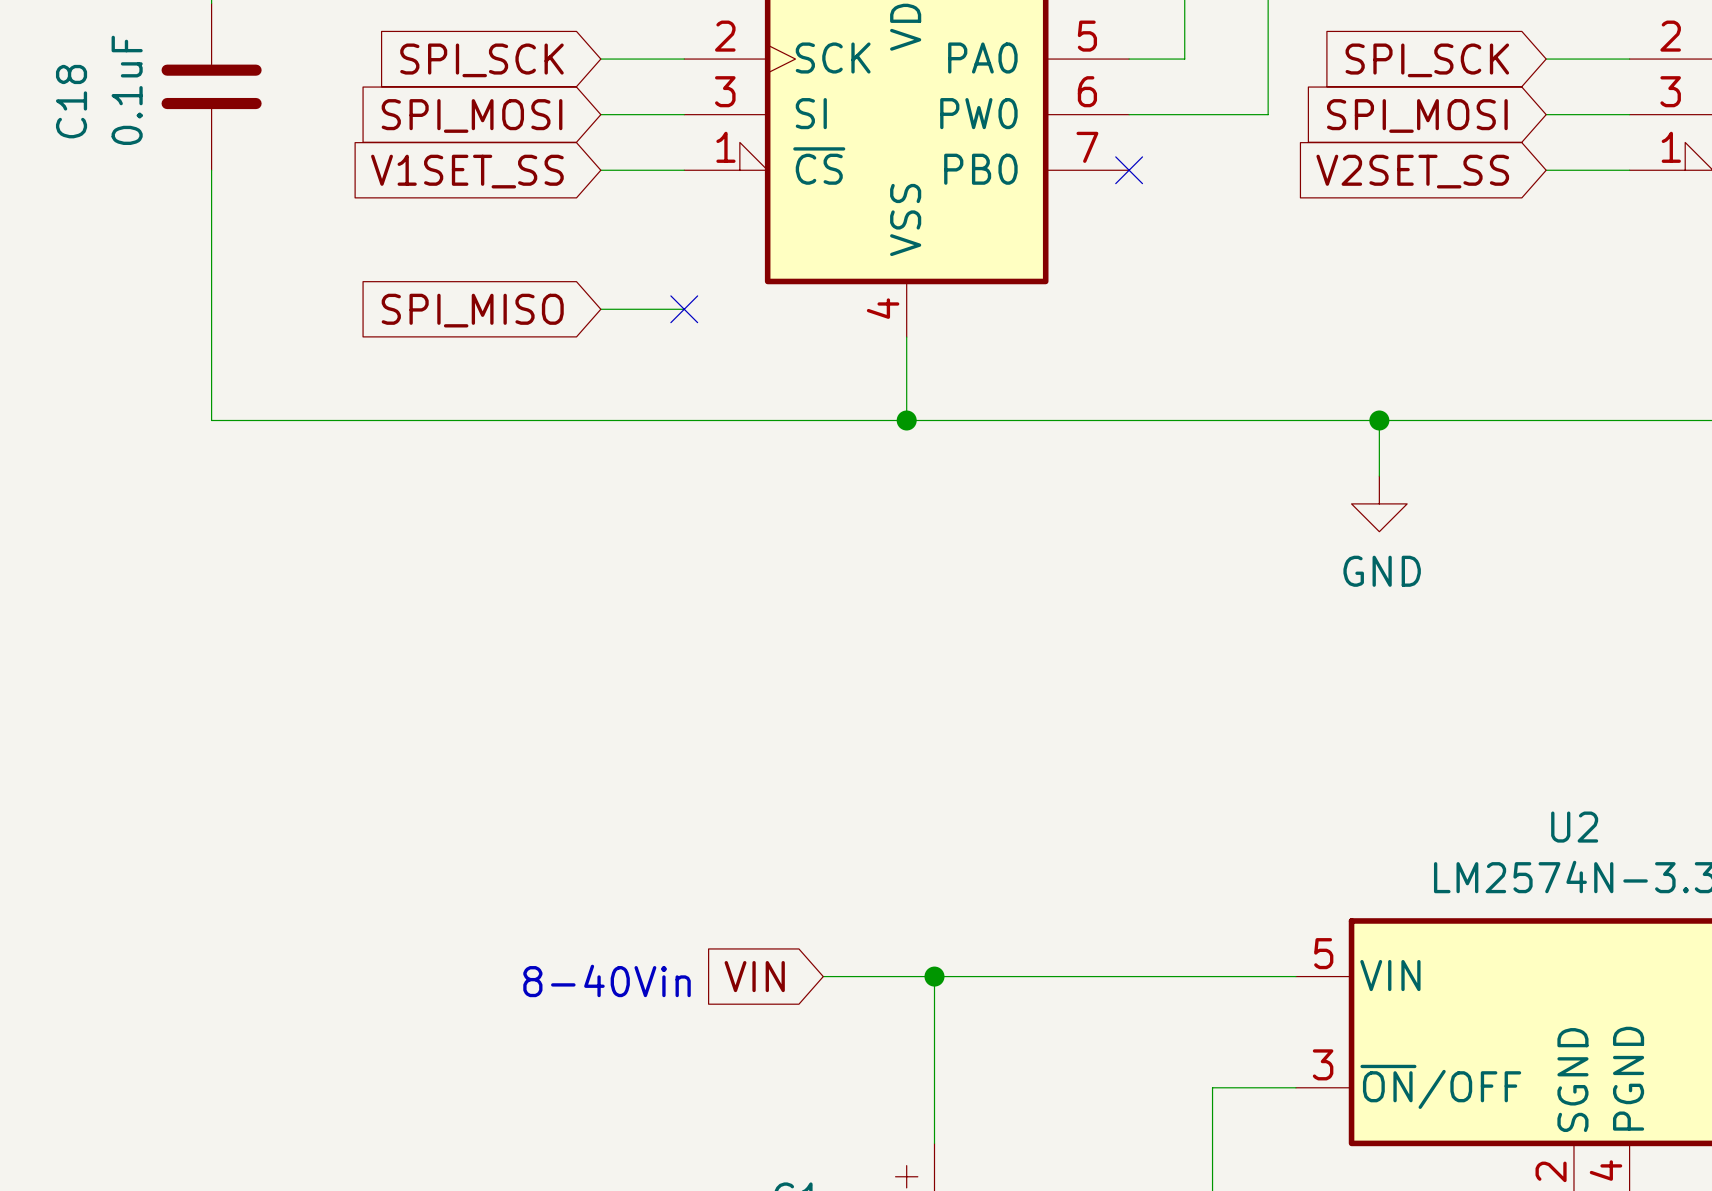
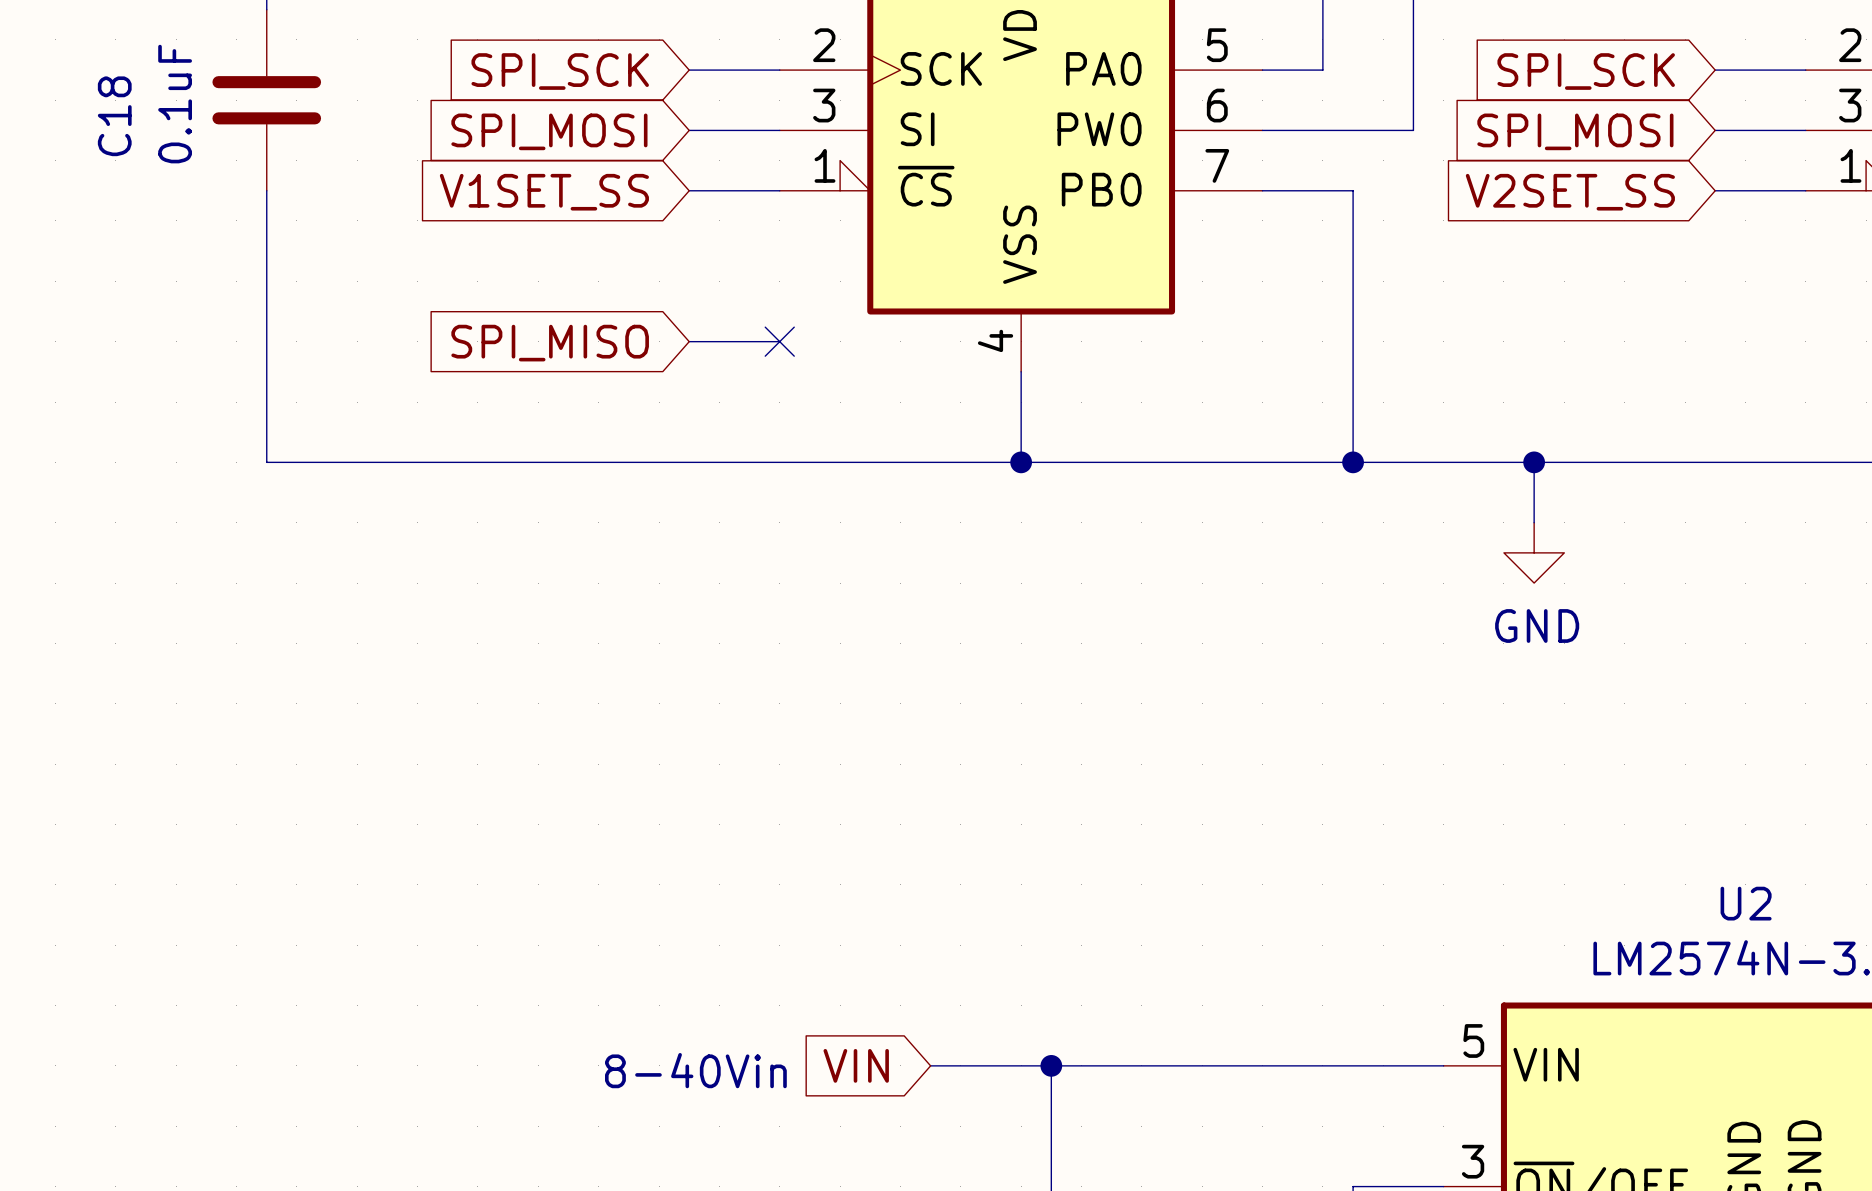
wire: none -> (1262, 190) (1353, 190) (1353, 462)
no-connect mark: (1129, 170) -> none
junction: none -> (1353, 462)

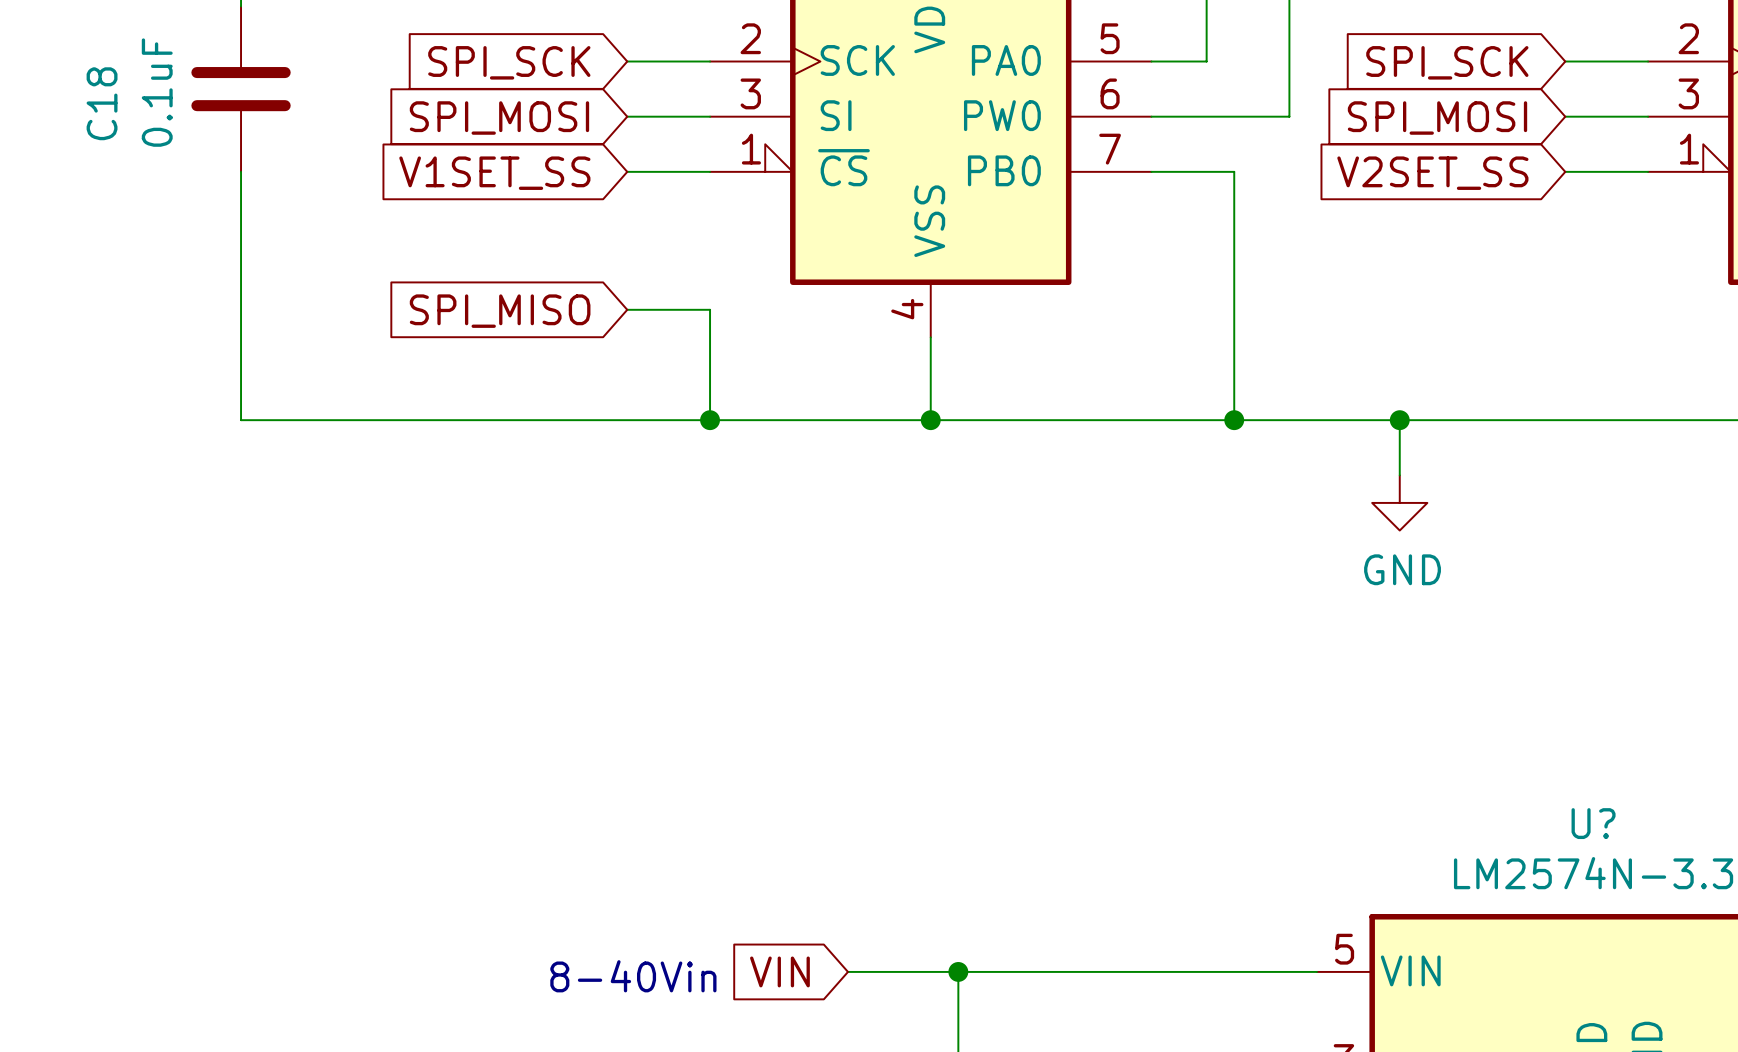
wire: none -> (710, 309) (710, 420)
no-connect mark: (779, 341) -> none
junction: none -> (710, 420)
U2 name: U2 (1746, 903) -> U? (1593, 823)

